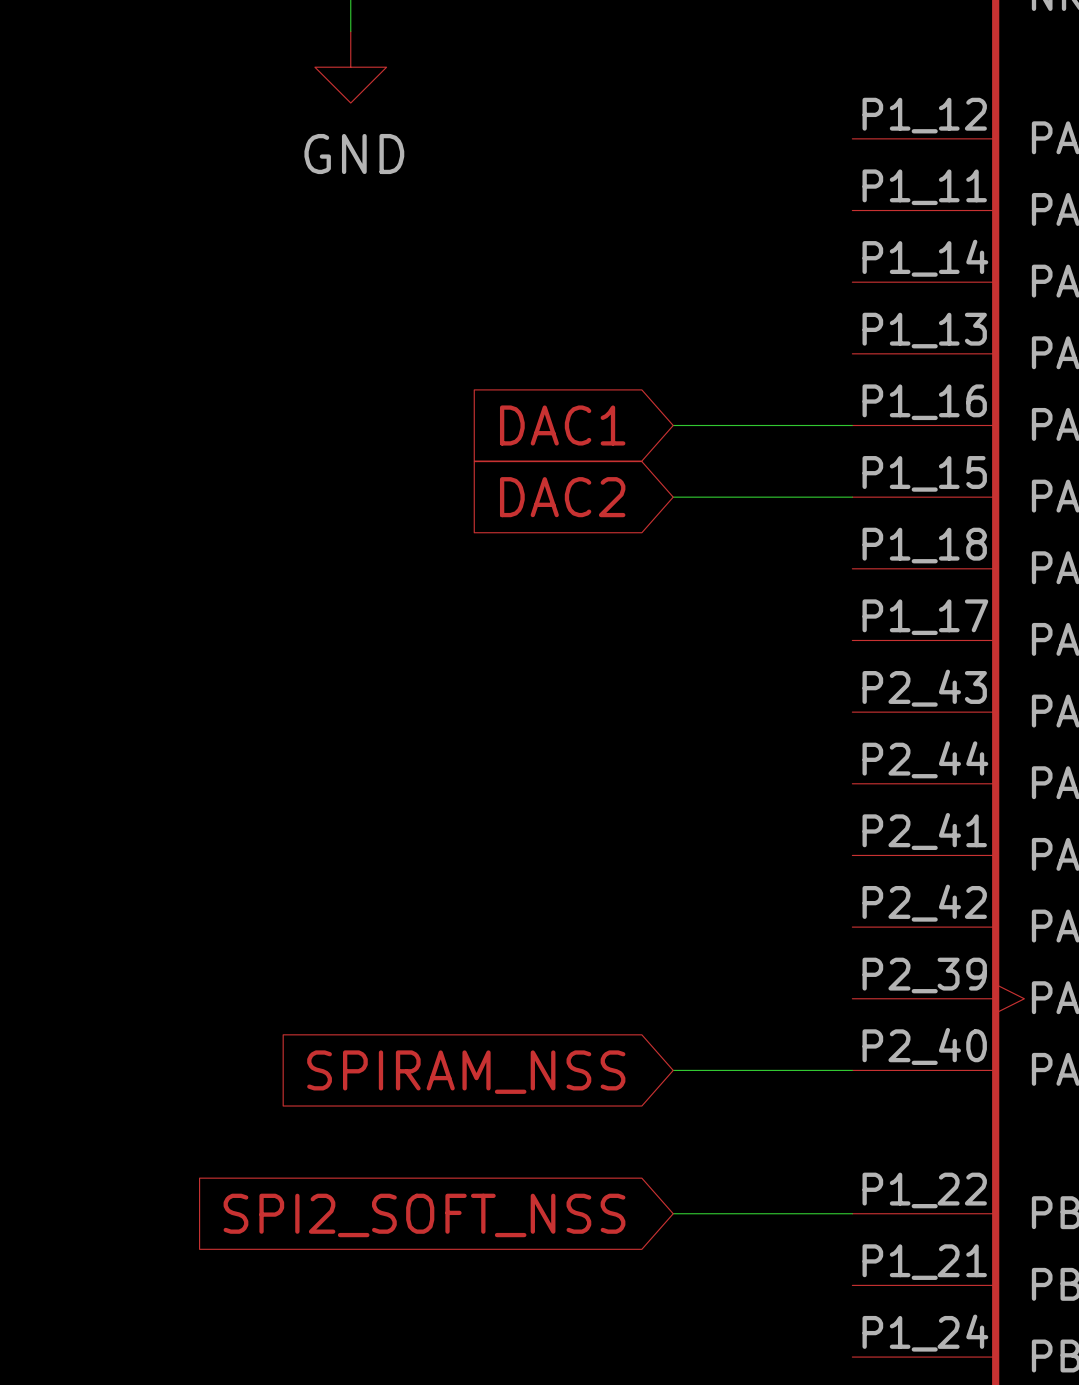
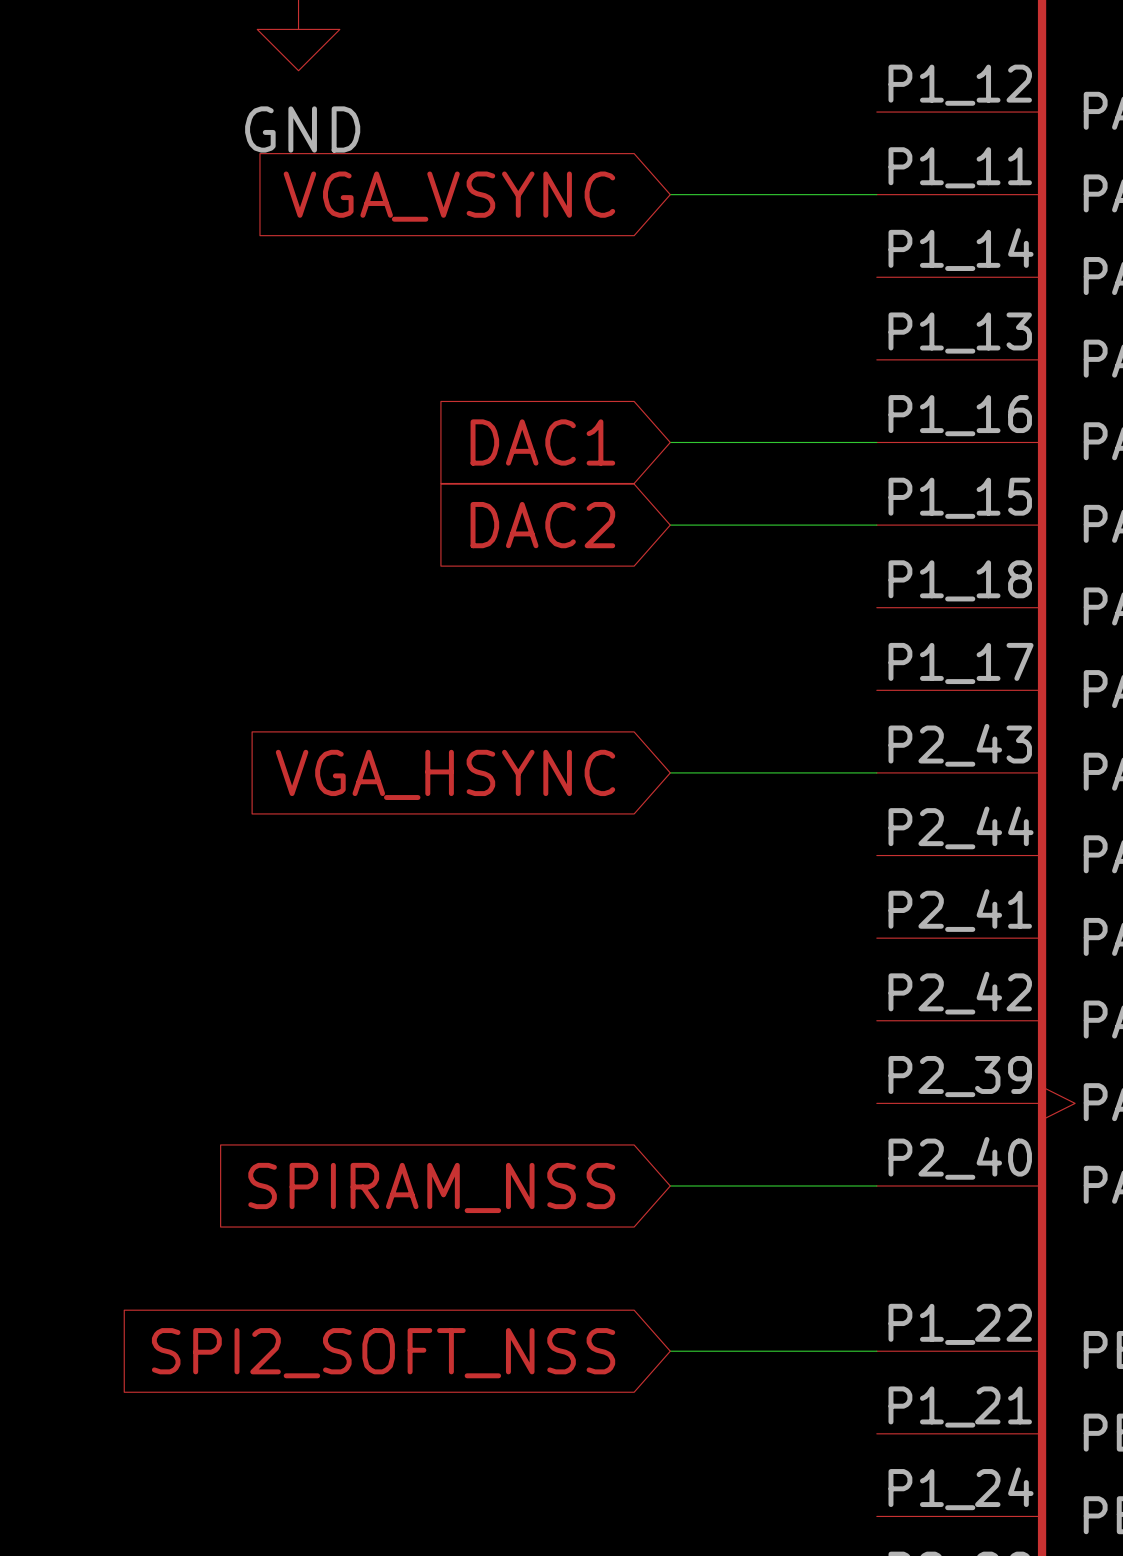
wire: none -> (670, 194) (876, 194)
global label: none -> VGA_VSYNC (449, 196)
wire: none -> (670, 772) (876, 772)
global label: none -> VGA_HSYNC (445, 774)

